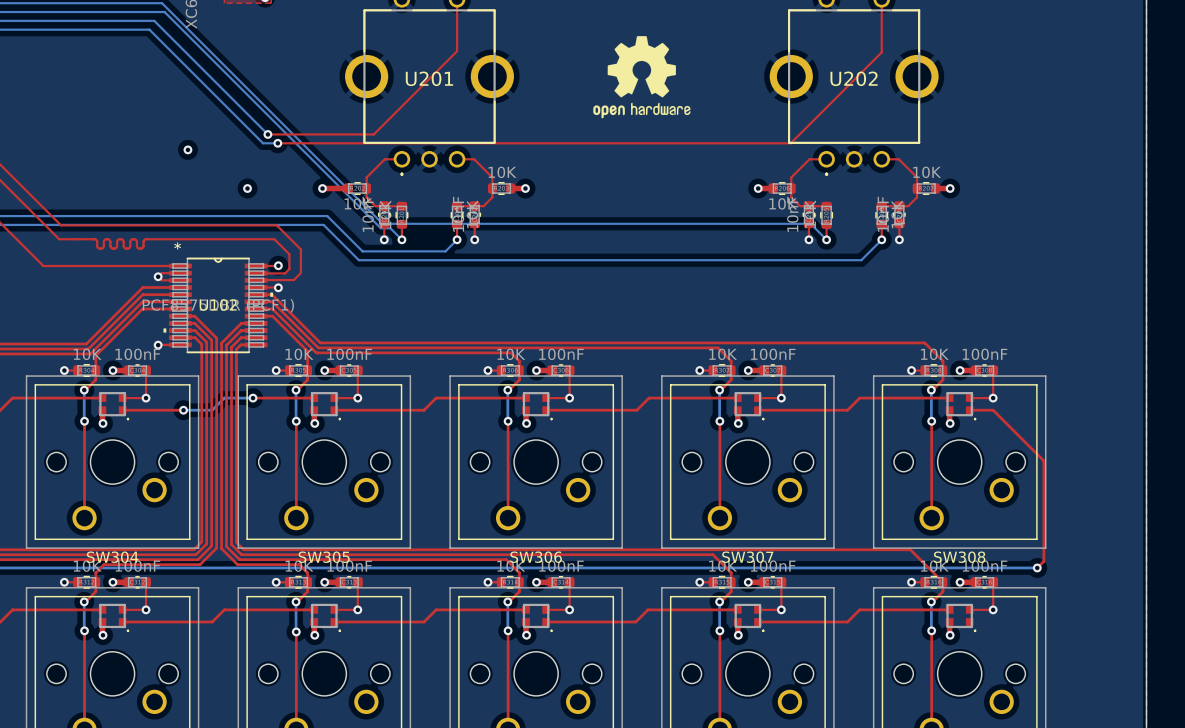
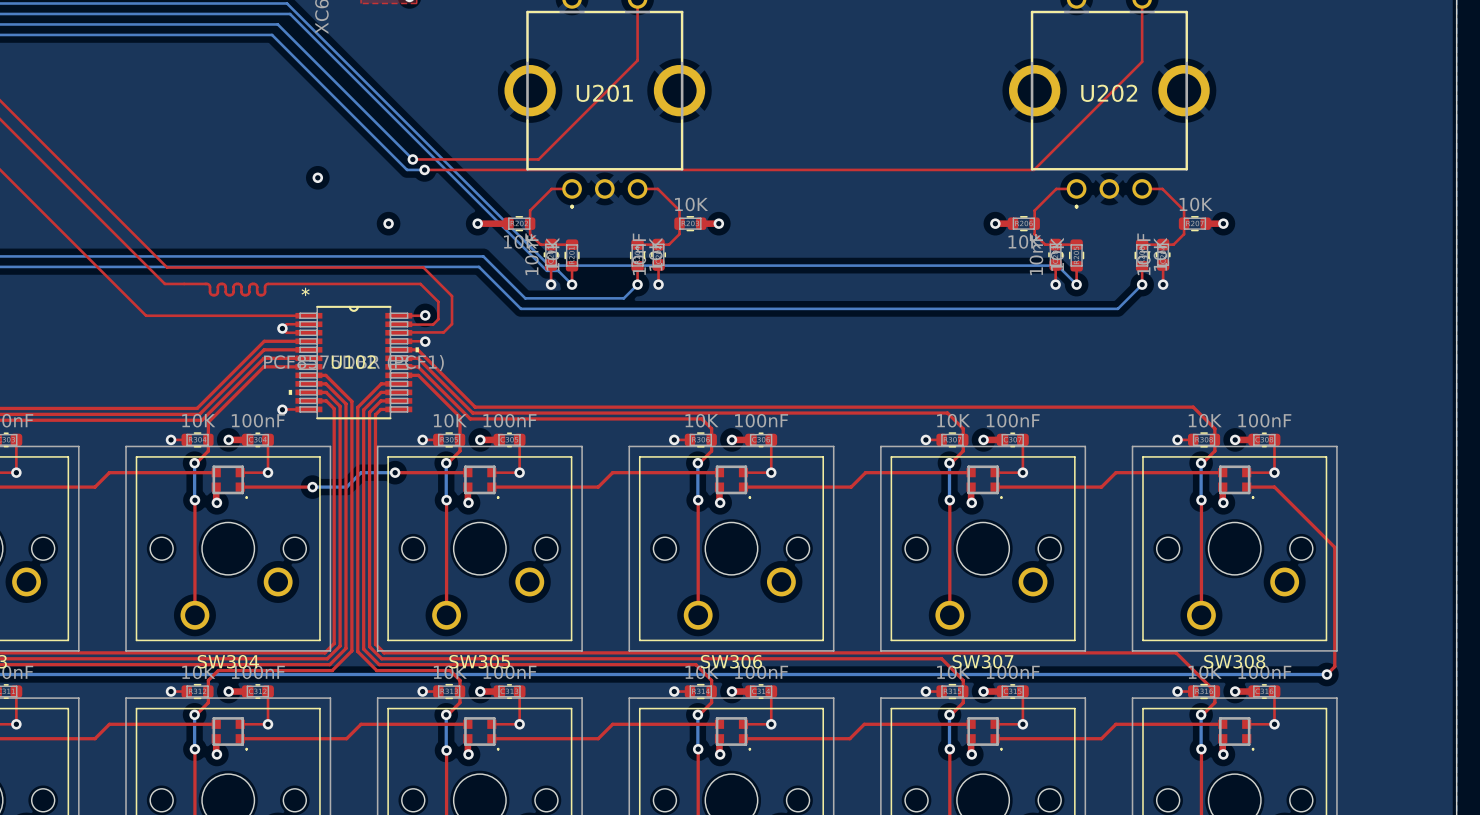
drawing: [593, 36, 691, 119] -> none

